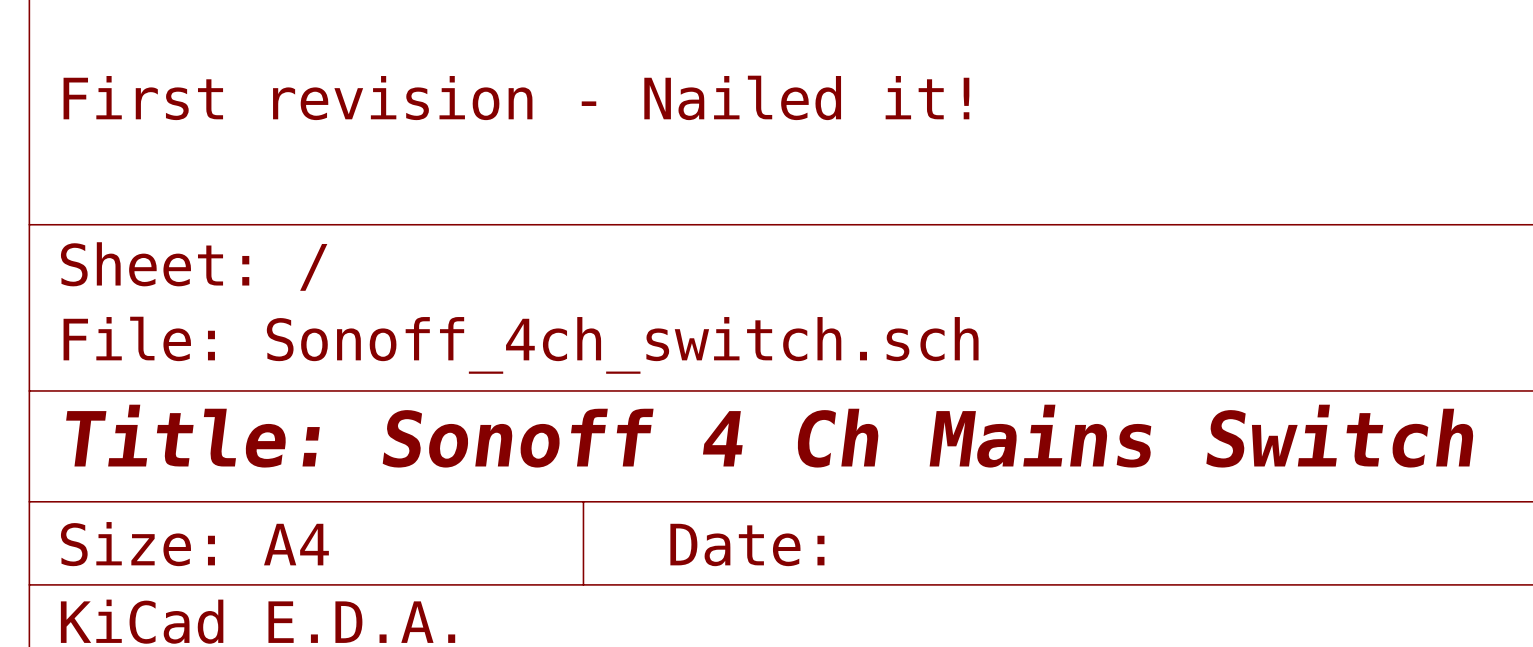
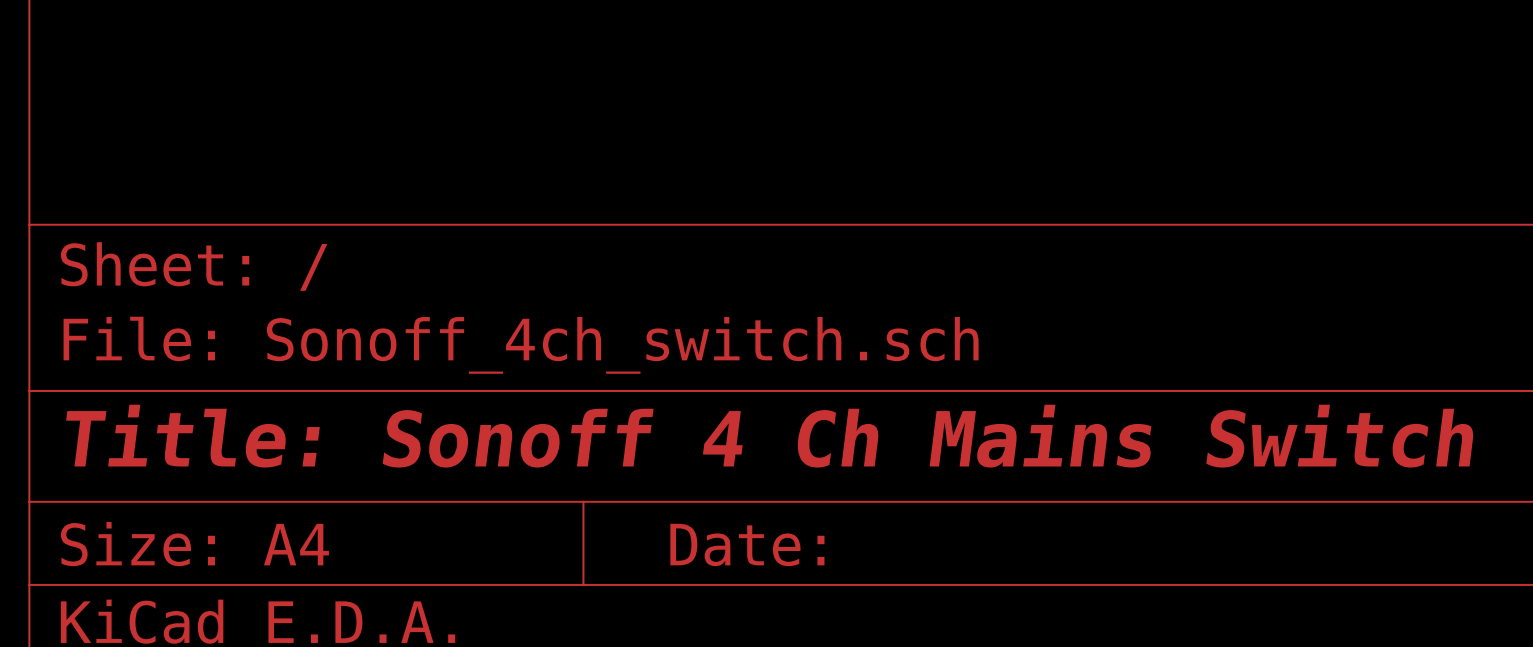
title block: First revision - Nailed it! (516, 97) -> none

